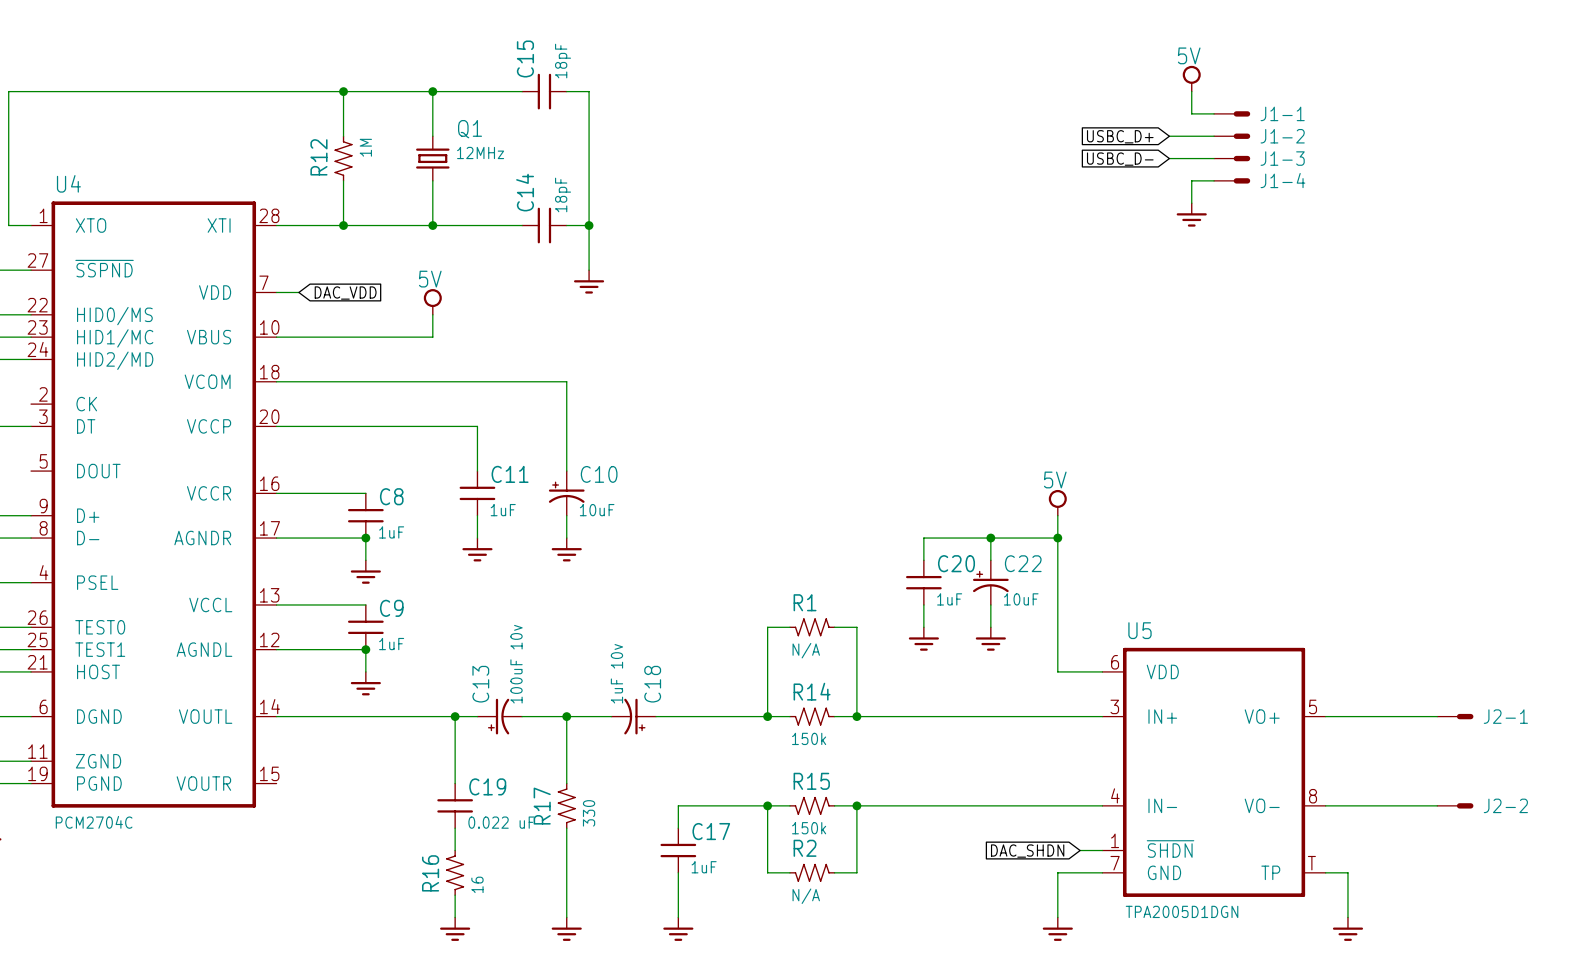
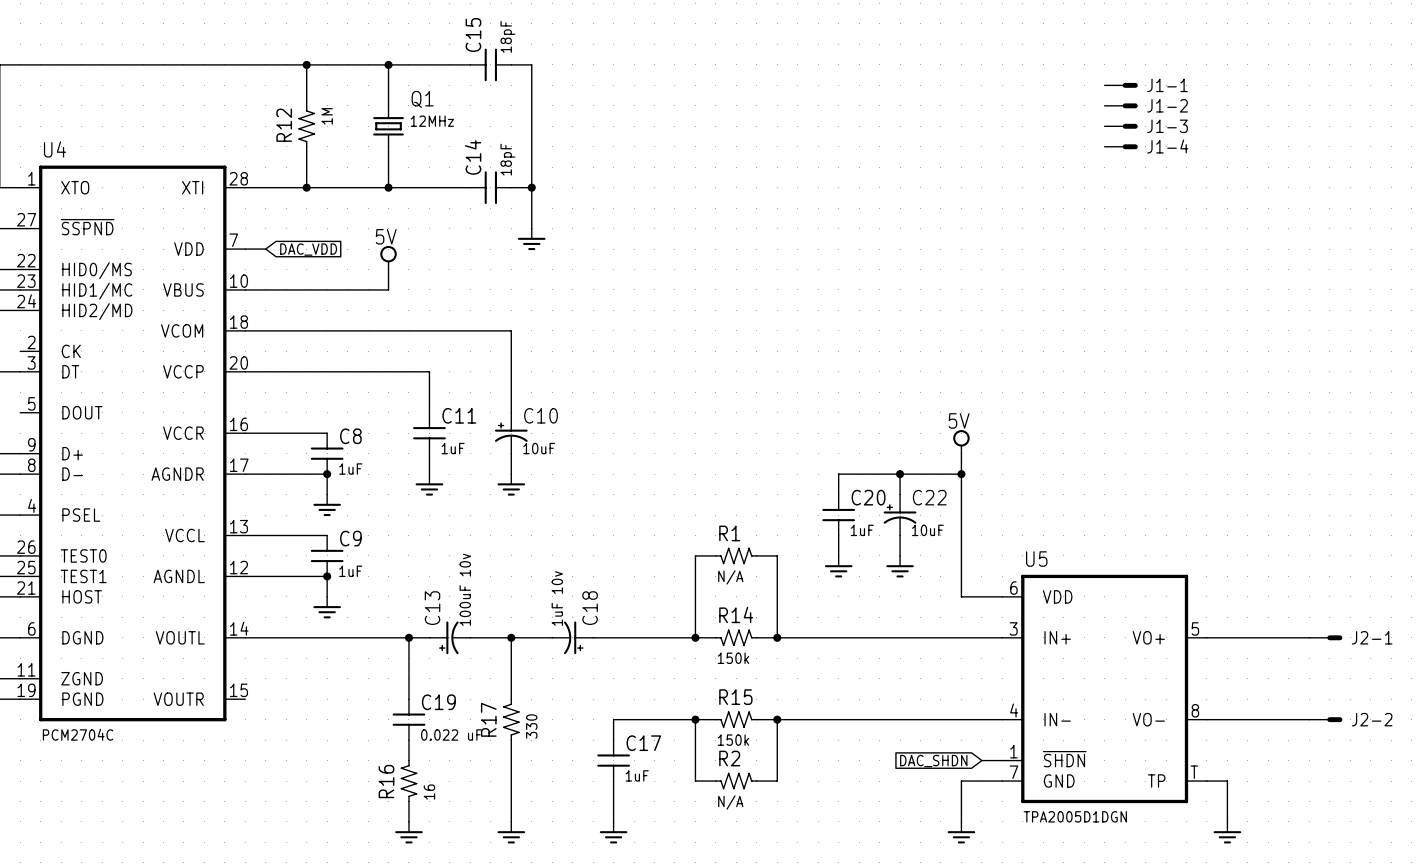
power symbol: 5V (1191, 79) -> none
wire: (1191, 91) (1191, 113) (1214, 113) -> none
global label: USBC_D+ (1120, 136) -> none
wire: (1169, 136) (1214, 136) -> none
wire: (1169, 158) (1214, 158) -> none
global label: USBC_D- (1120, 159) -> none
wire: (1214, 180) (1191, 180) (1191, 203) -> none
power symbol: (1191, 214) -> none

